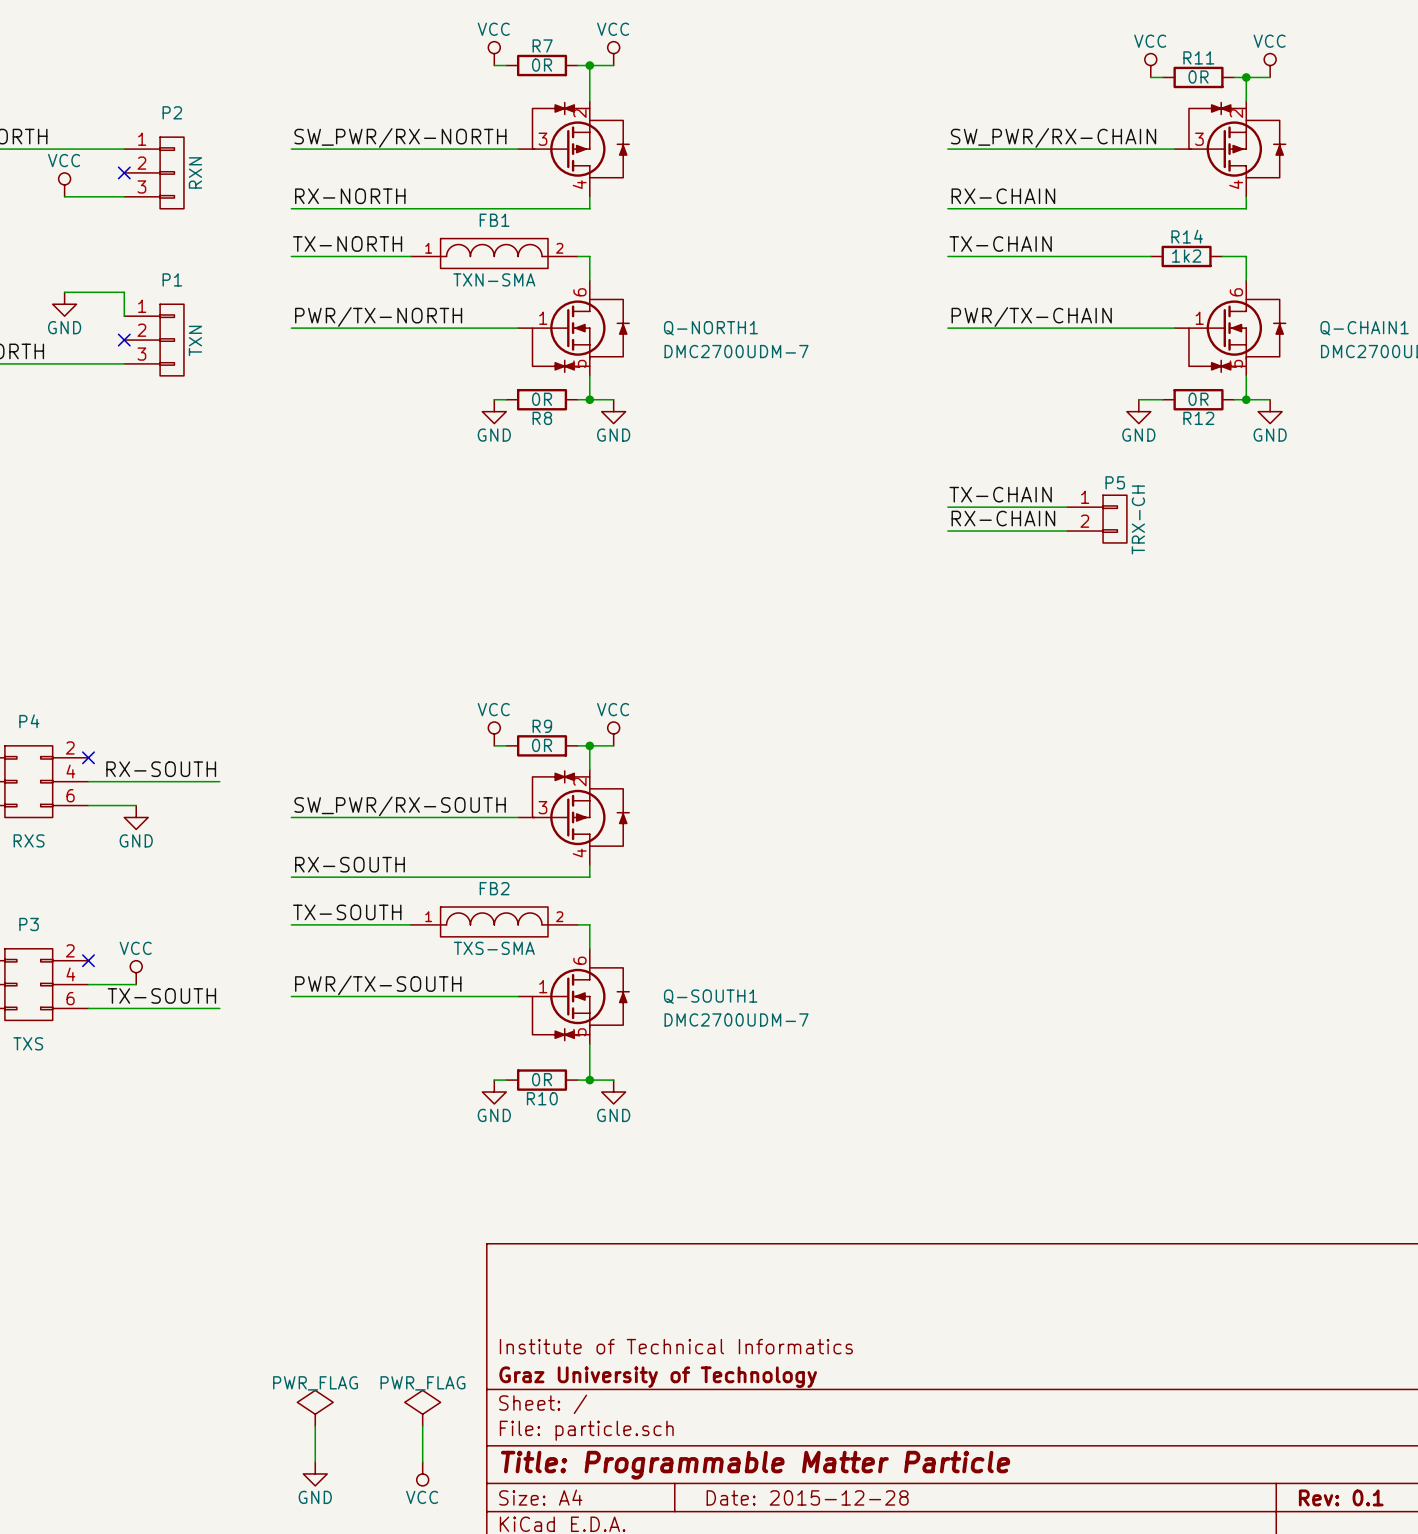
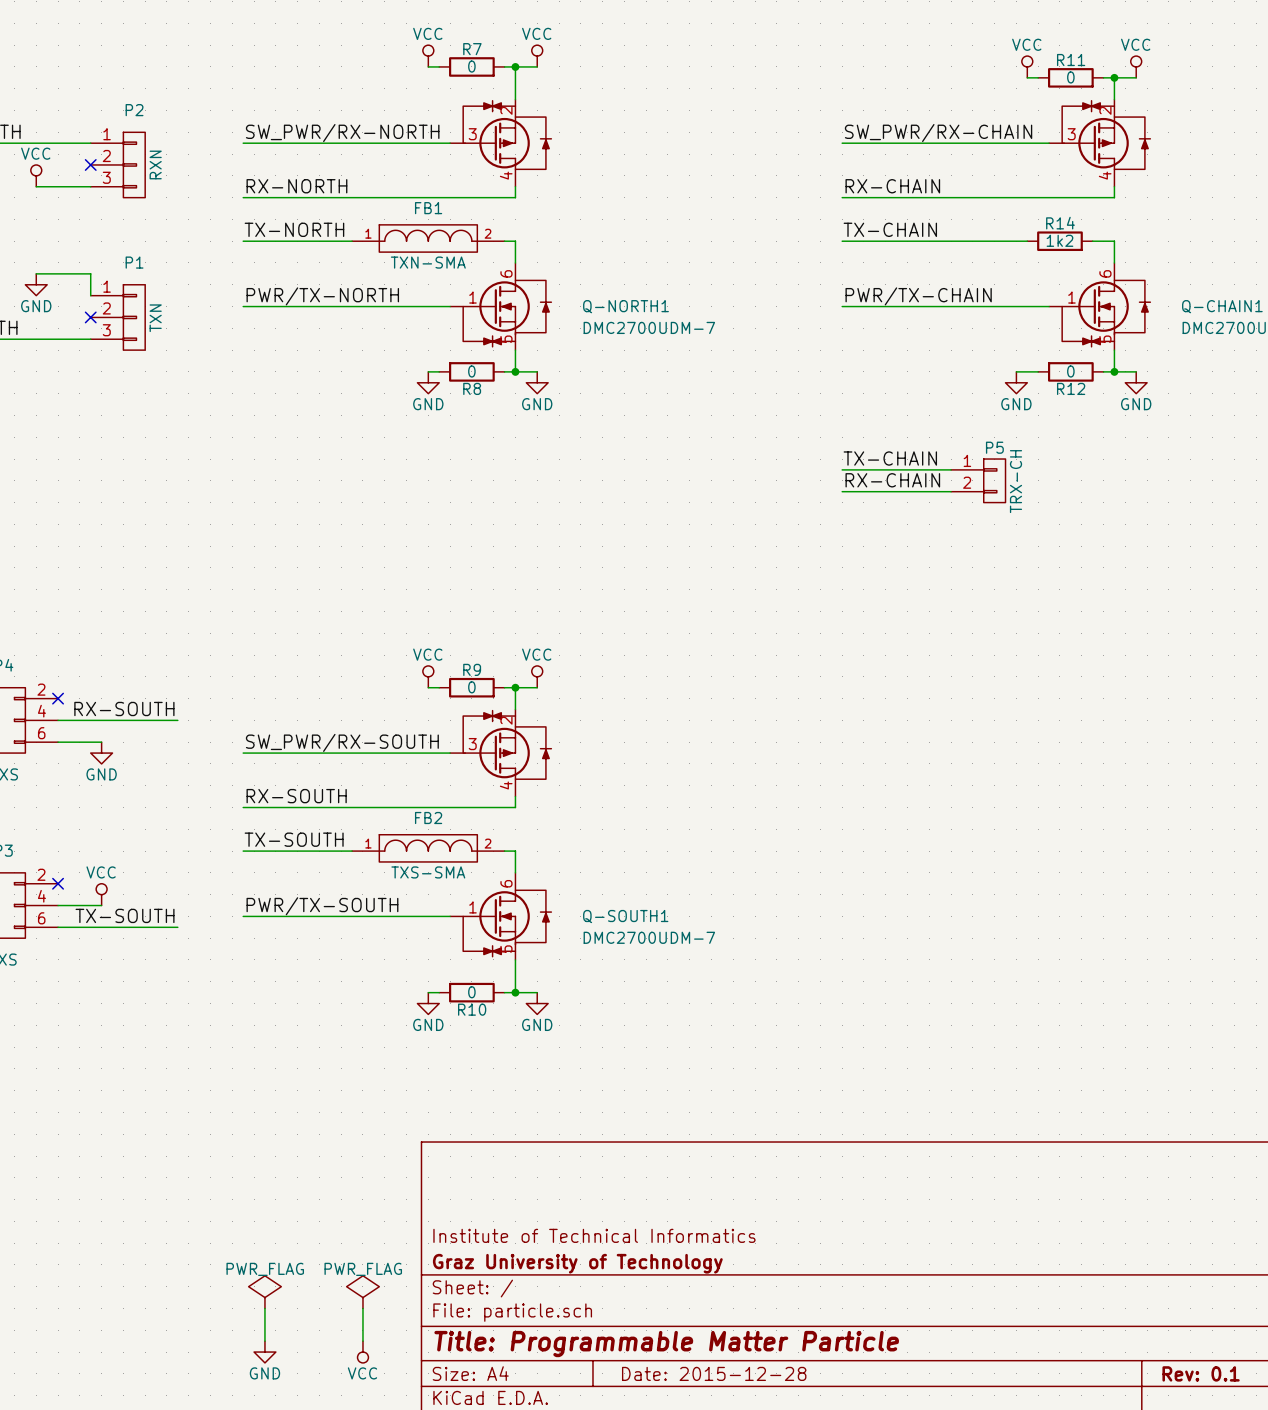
R7 value: 0R (542, 65) -> 0 (471, 66)
R11 value: 0R (1198, 77) -> 0 (1070, 77)
R8 value: 0R (542, 399) -> 0 (471, 371)
R12 value: 0R (1198, 399) -> 0 (1070, 371)
R9 value: 0R (542, 745) -> 0 (471, 687)
R10 value: 0R (542, 1079) -> 0 (471, 992)

